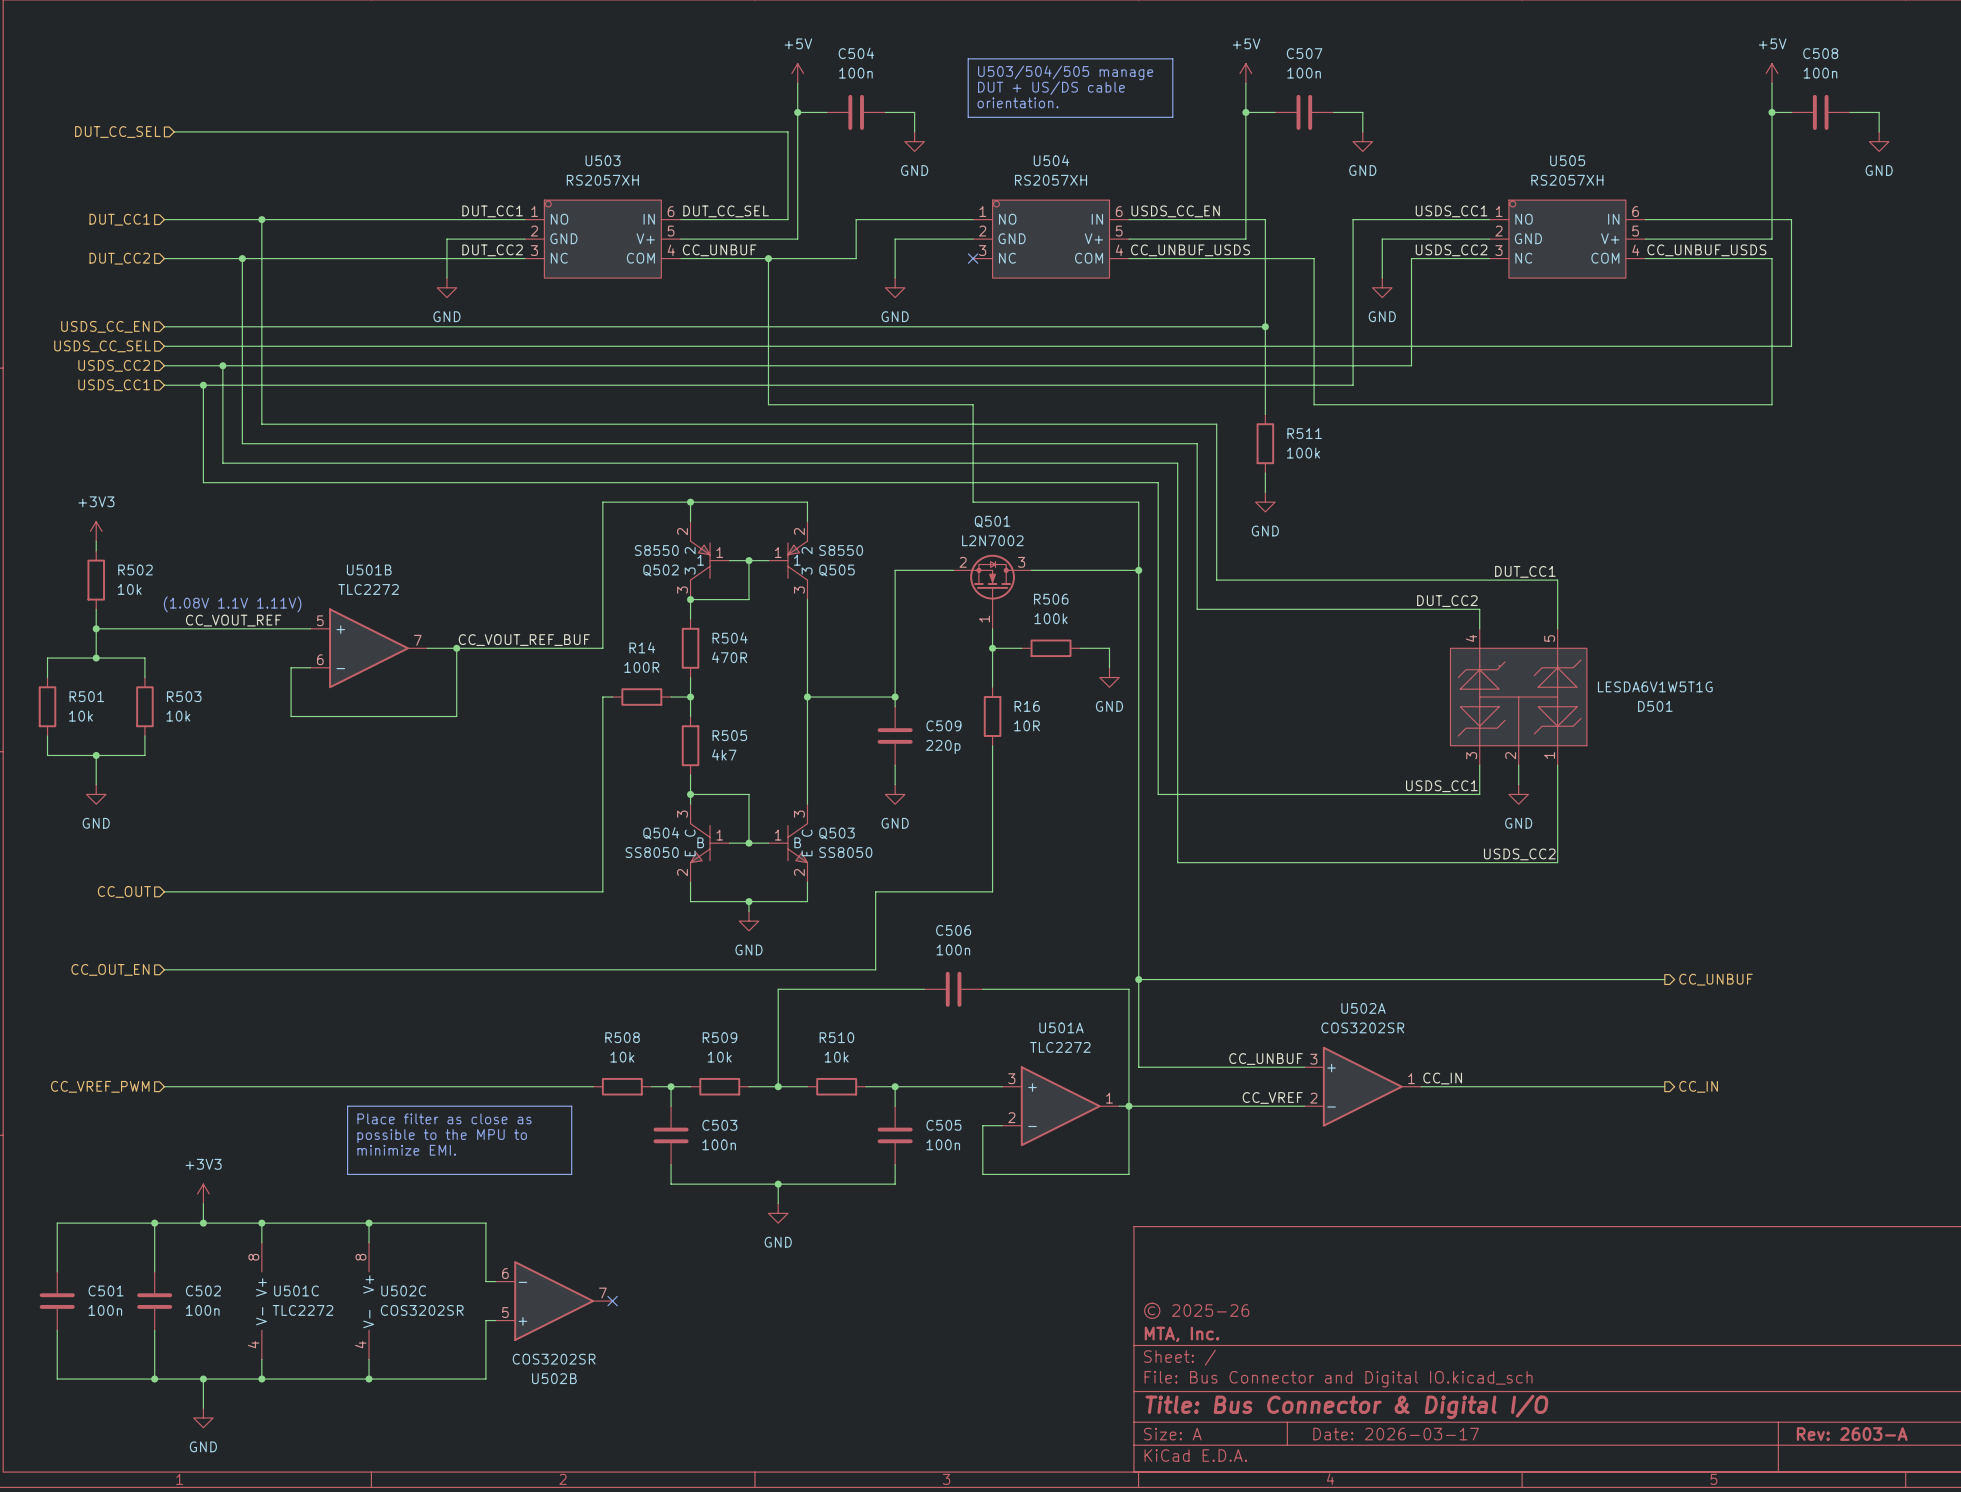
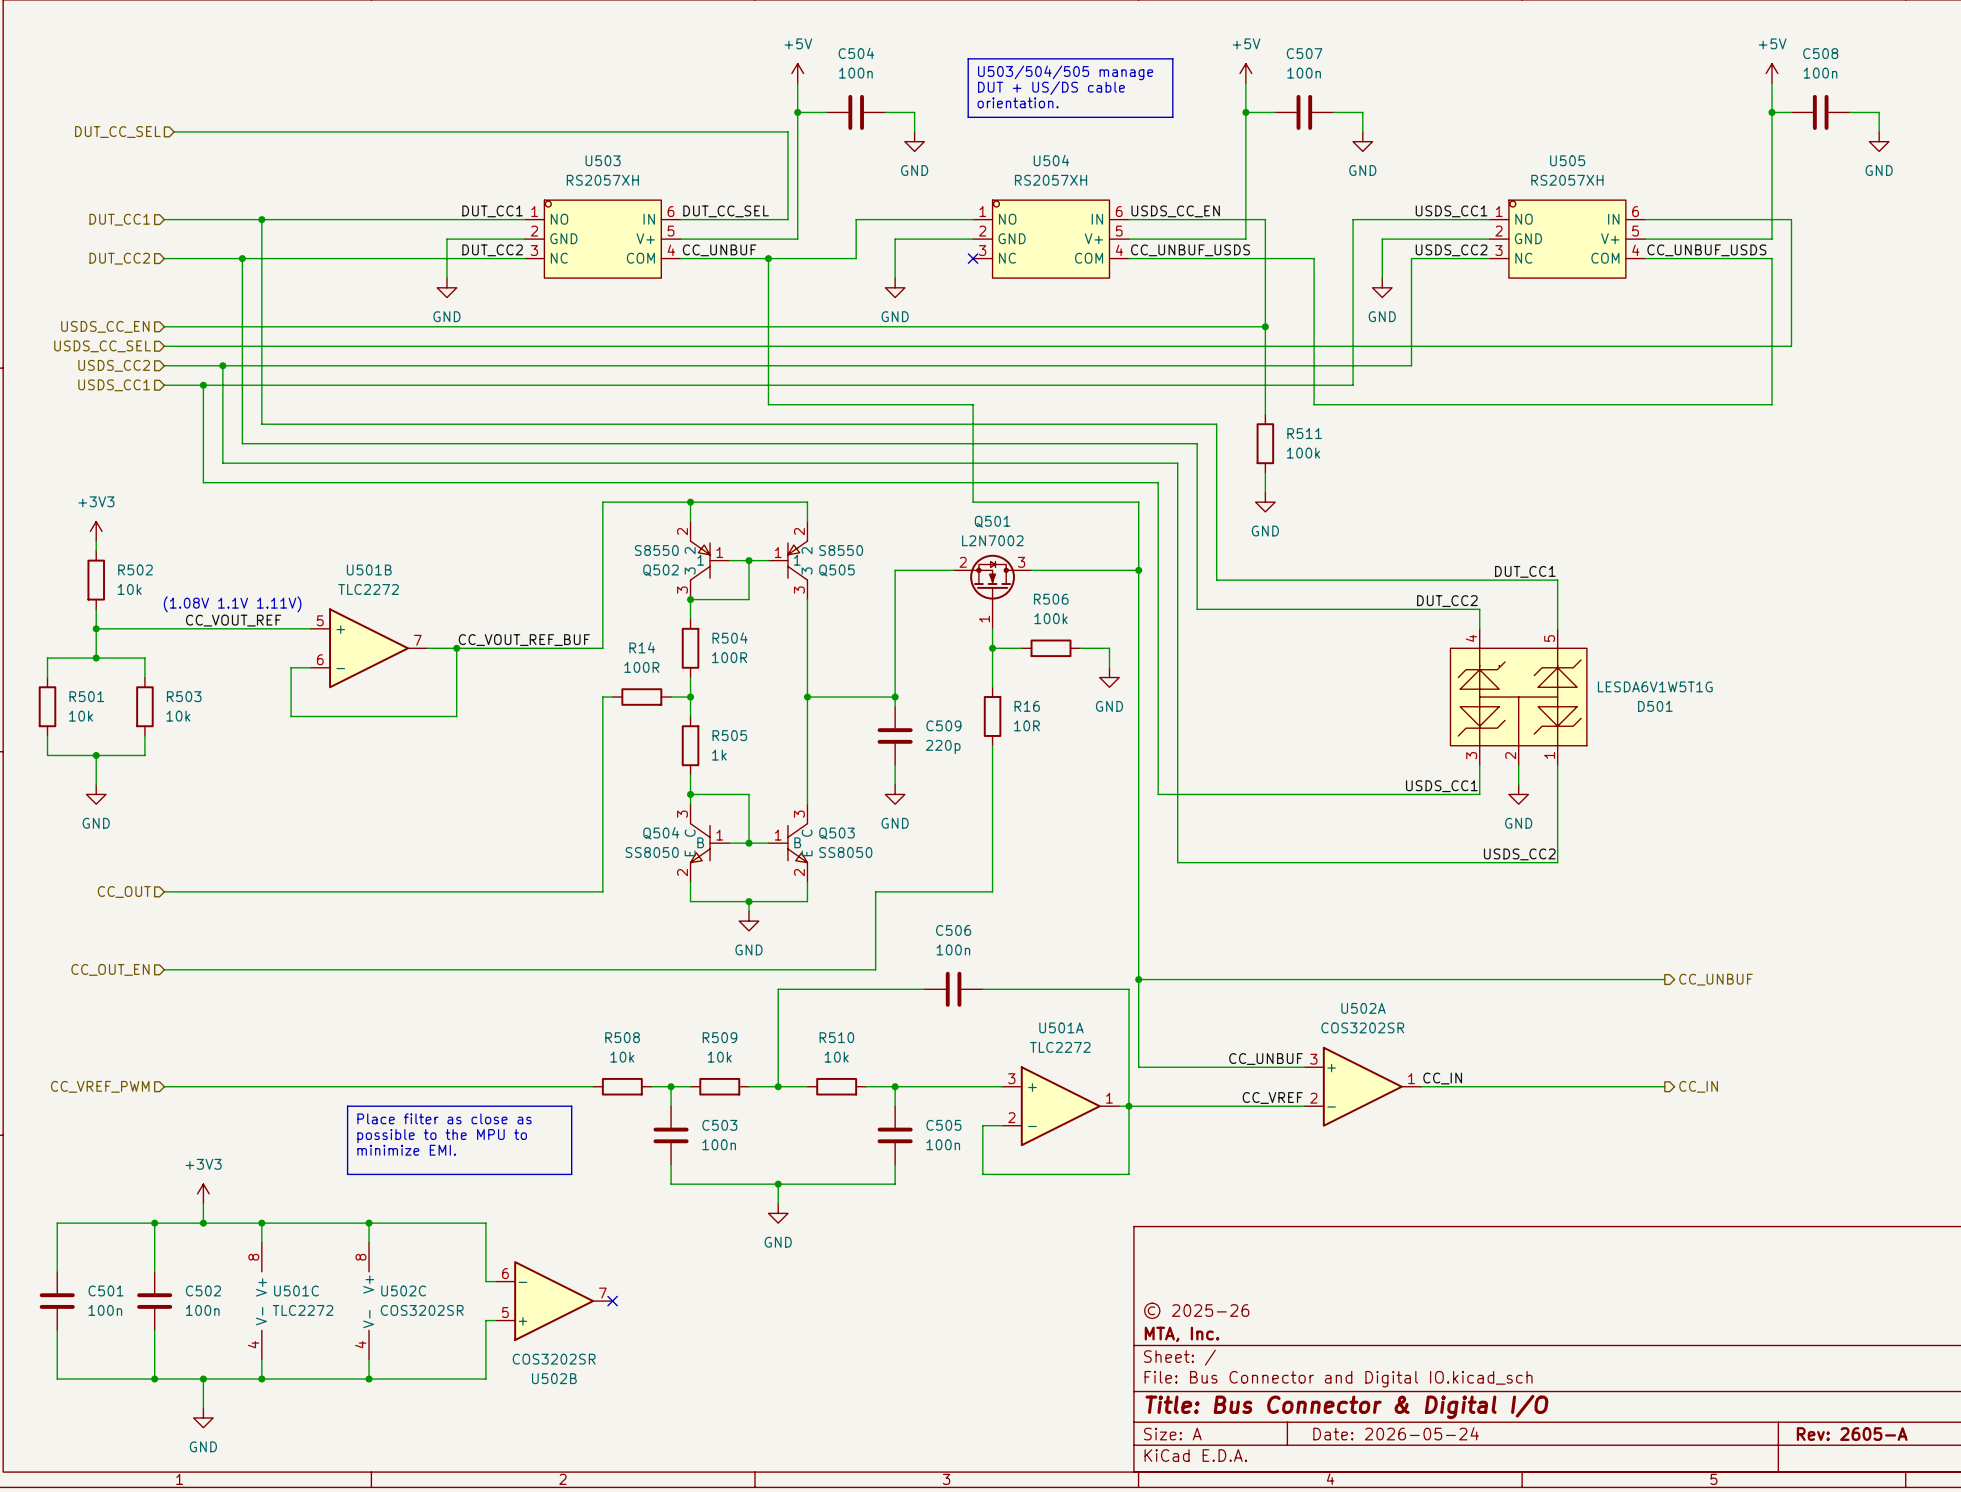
R504 value: 470R (729, 657) -> 100R (729, 657)
R505 value: 4k7 (724, 754) -> 1k (719, 755)
title block: Date: 2026-03-17 (1396, 1434) -> Date: 2026-05-24 (1396, 1433)
title block: Rev: 2603-A (1852, 1434) -> Rev: 2605-A (1852, 1434)

